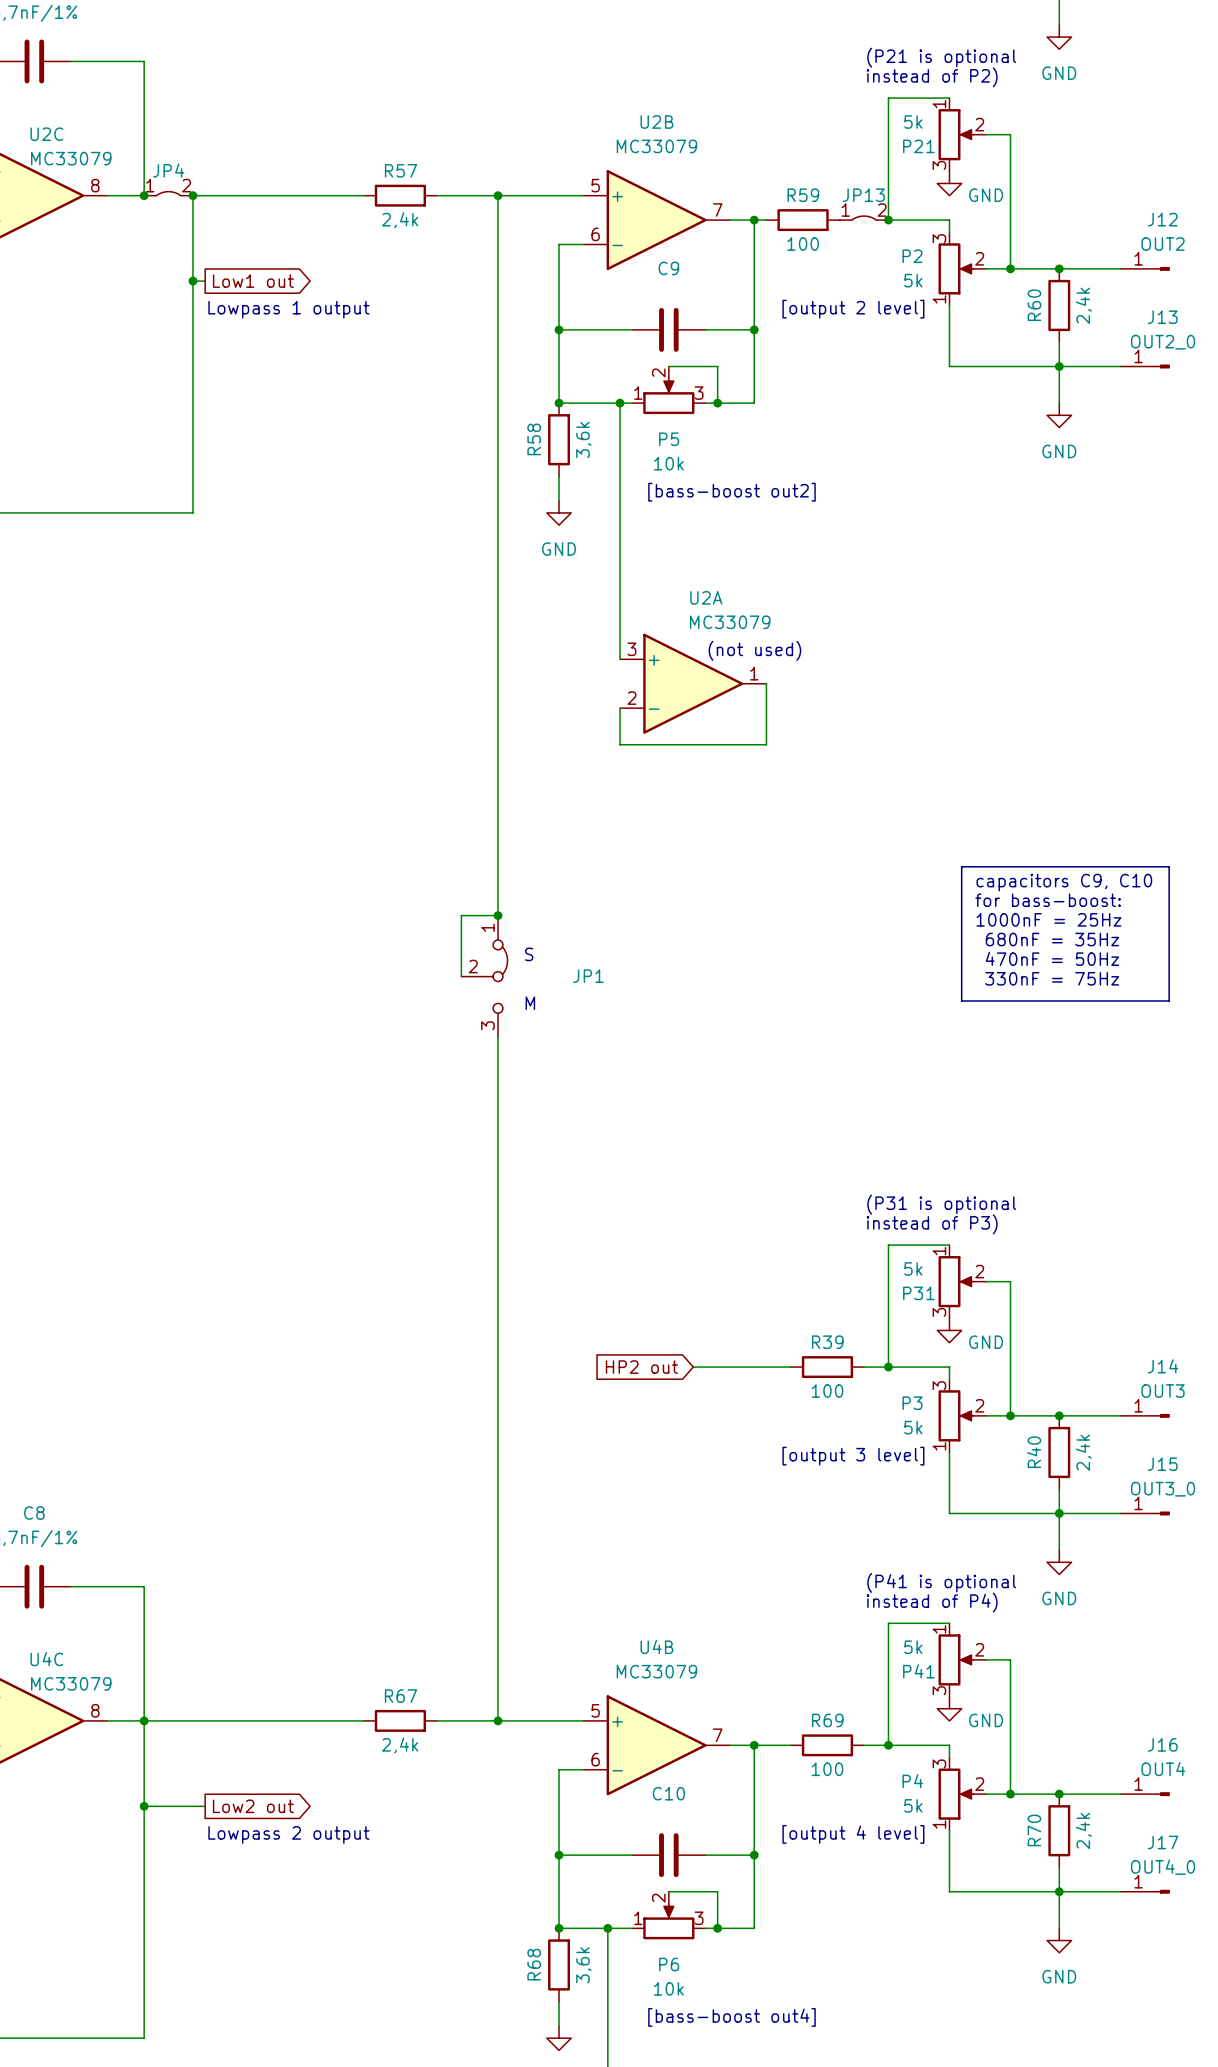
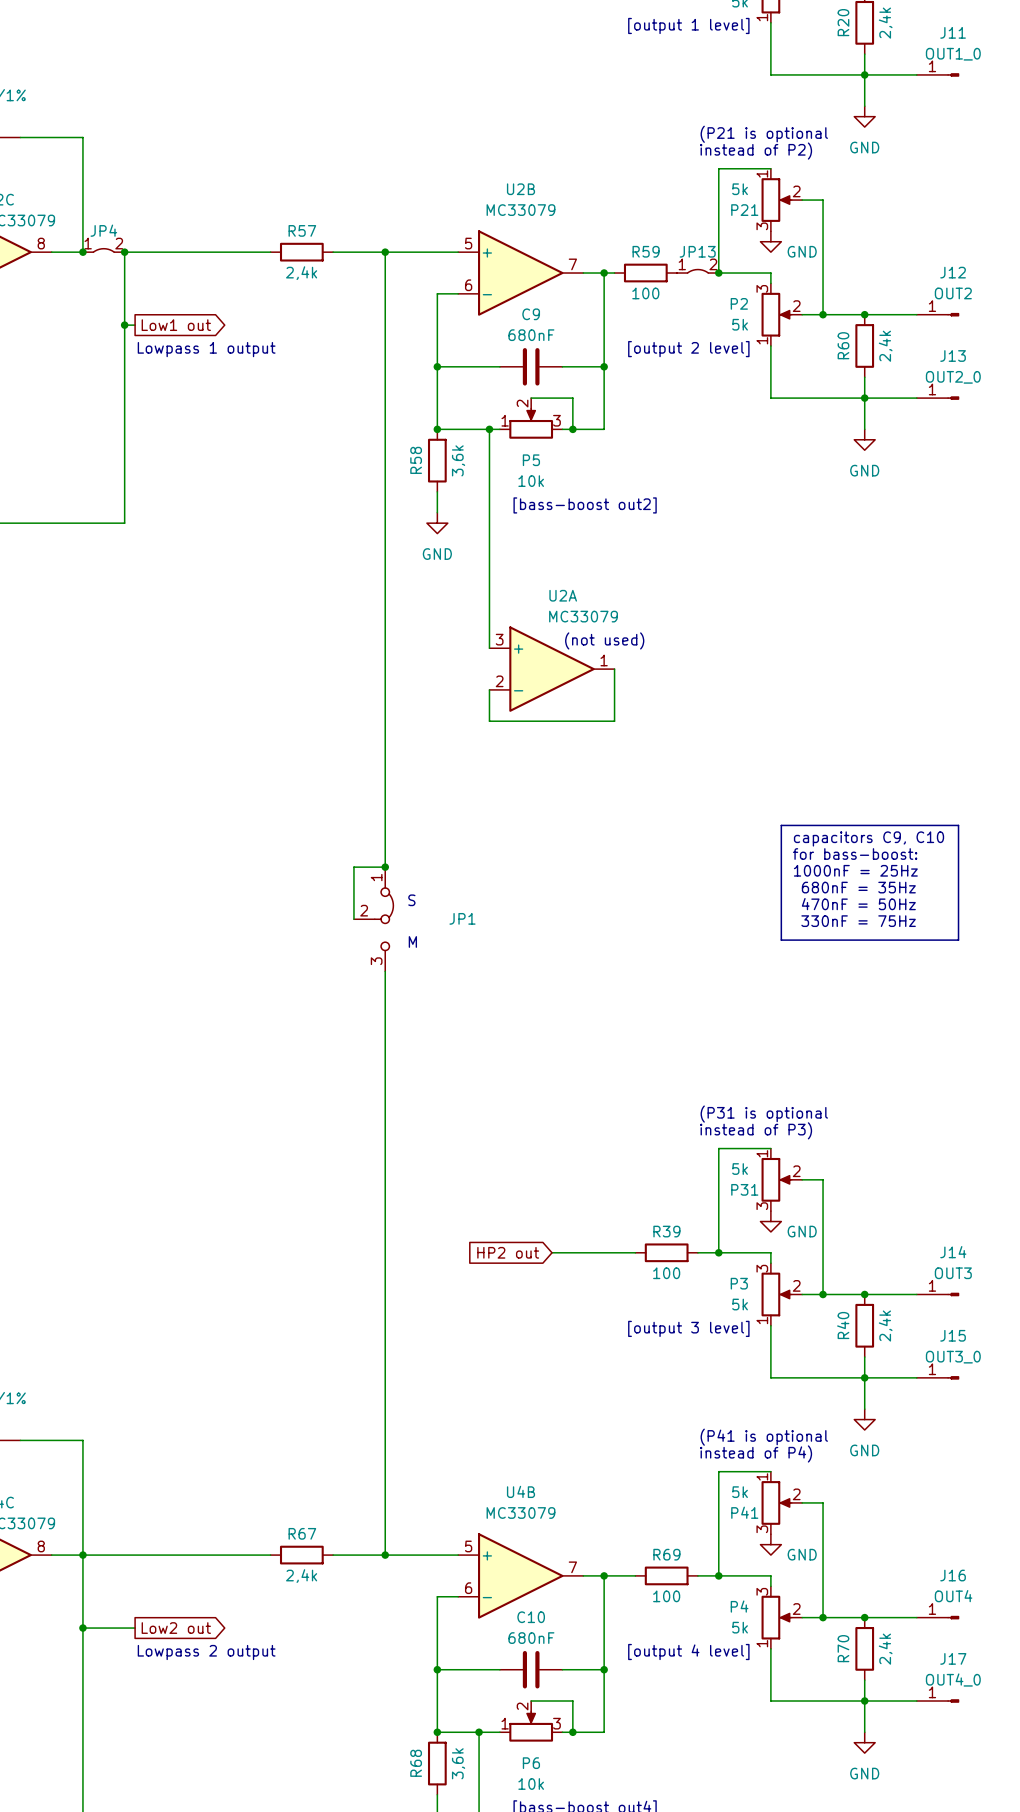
C9 value: none -> 680nF (531, 335)
C10 value: none -> 680nF (531, 1638)

